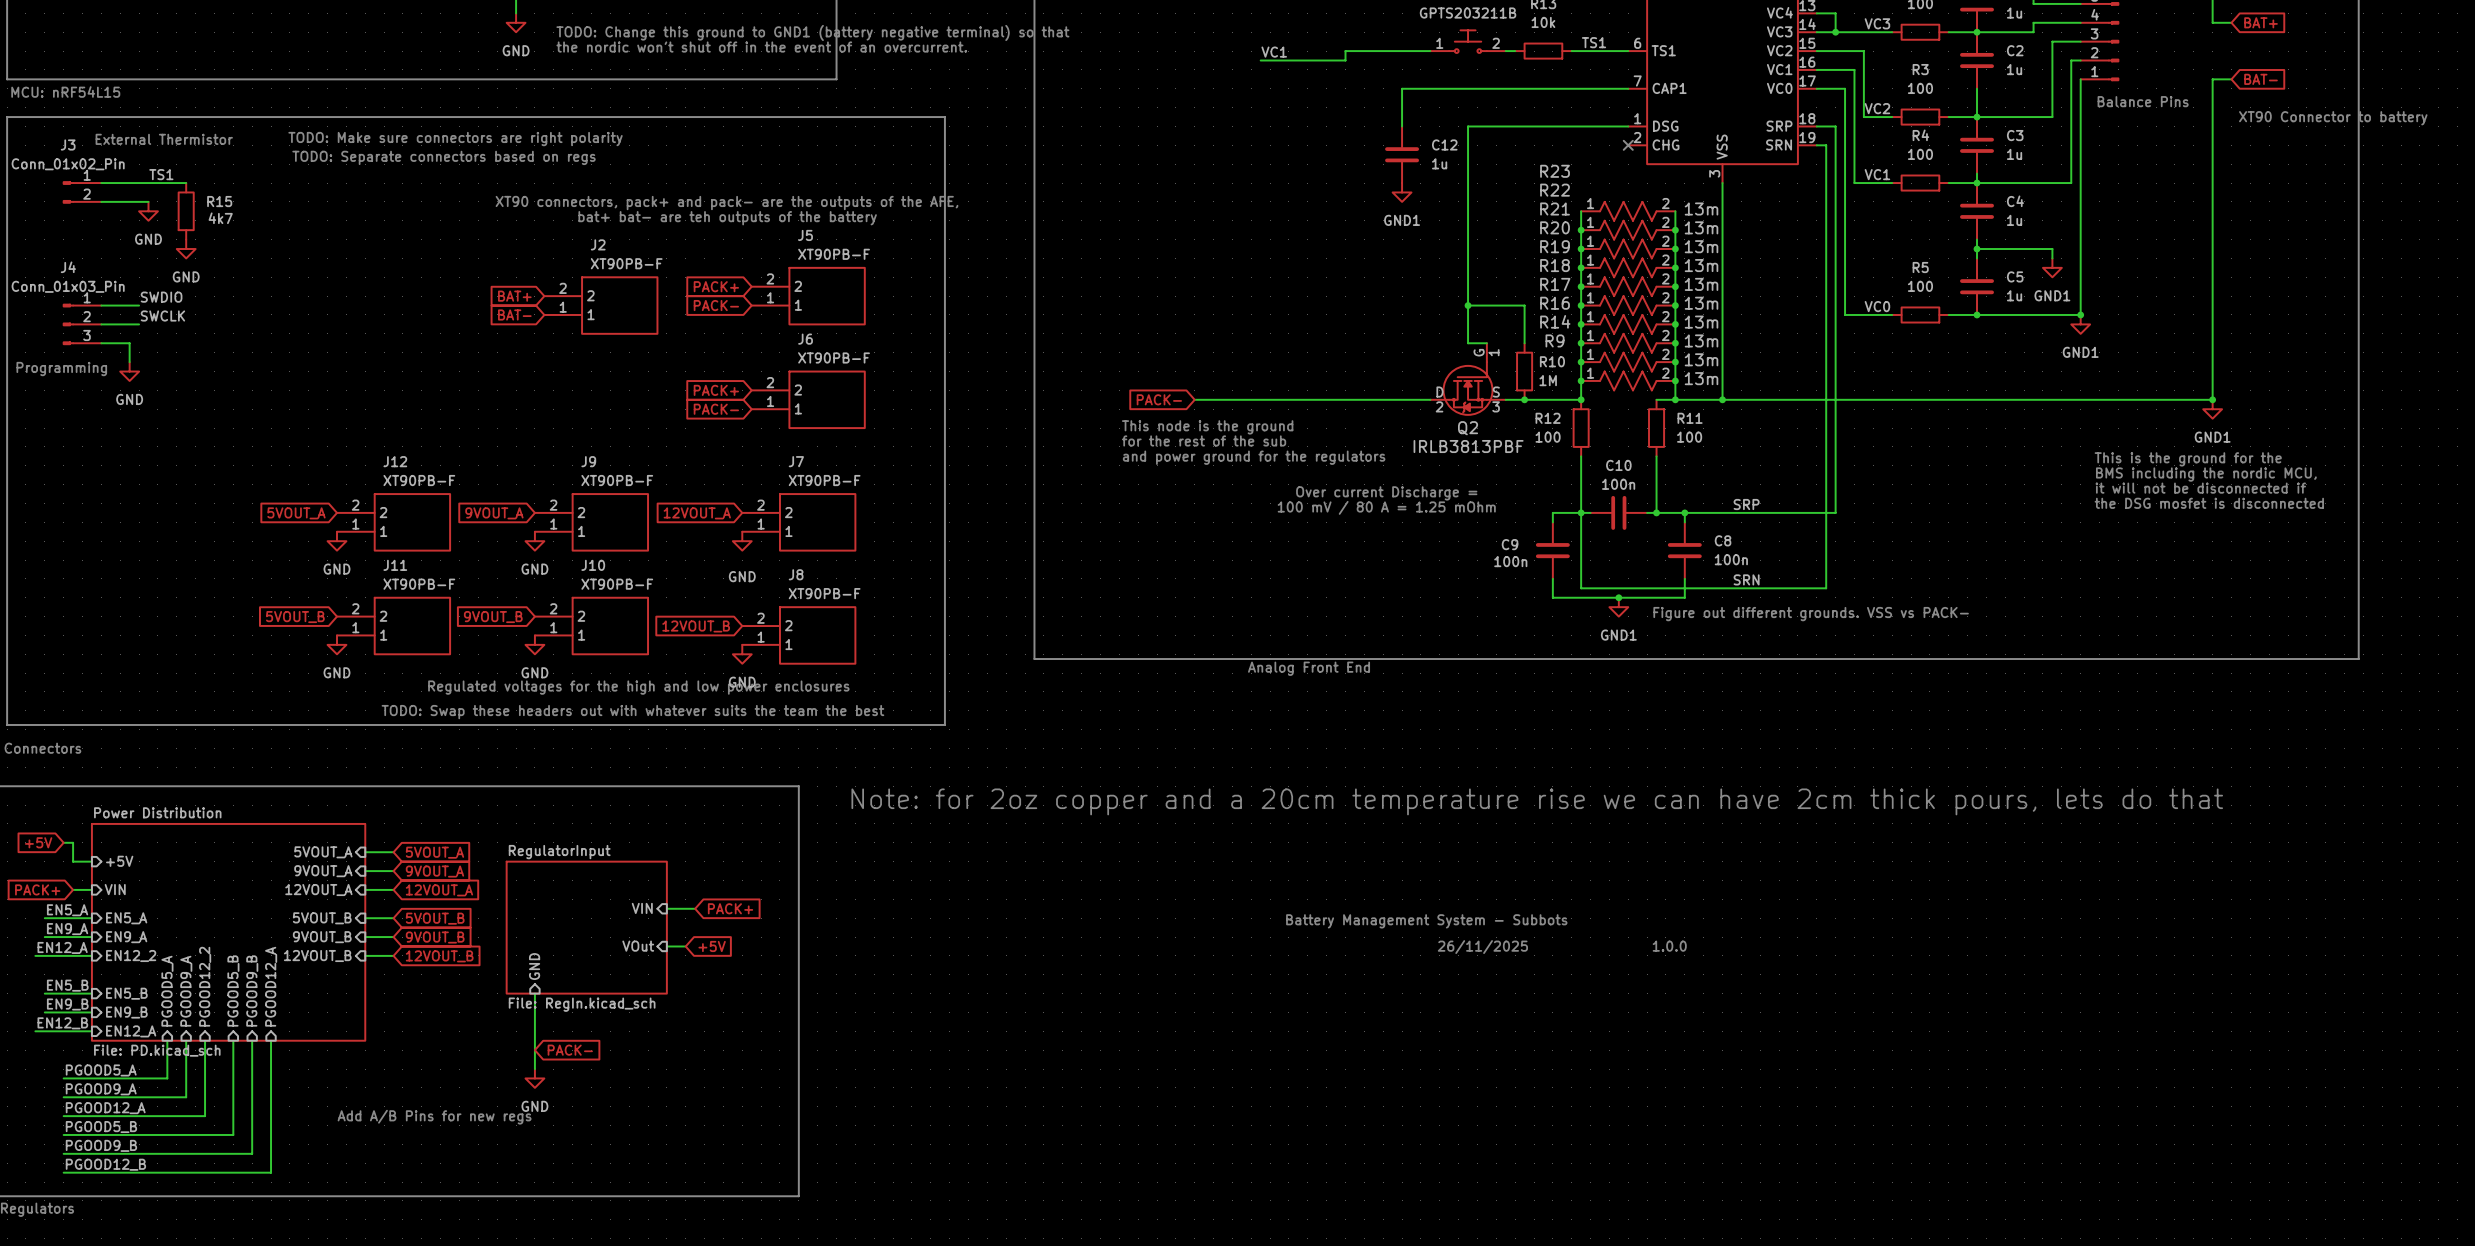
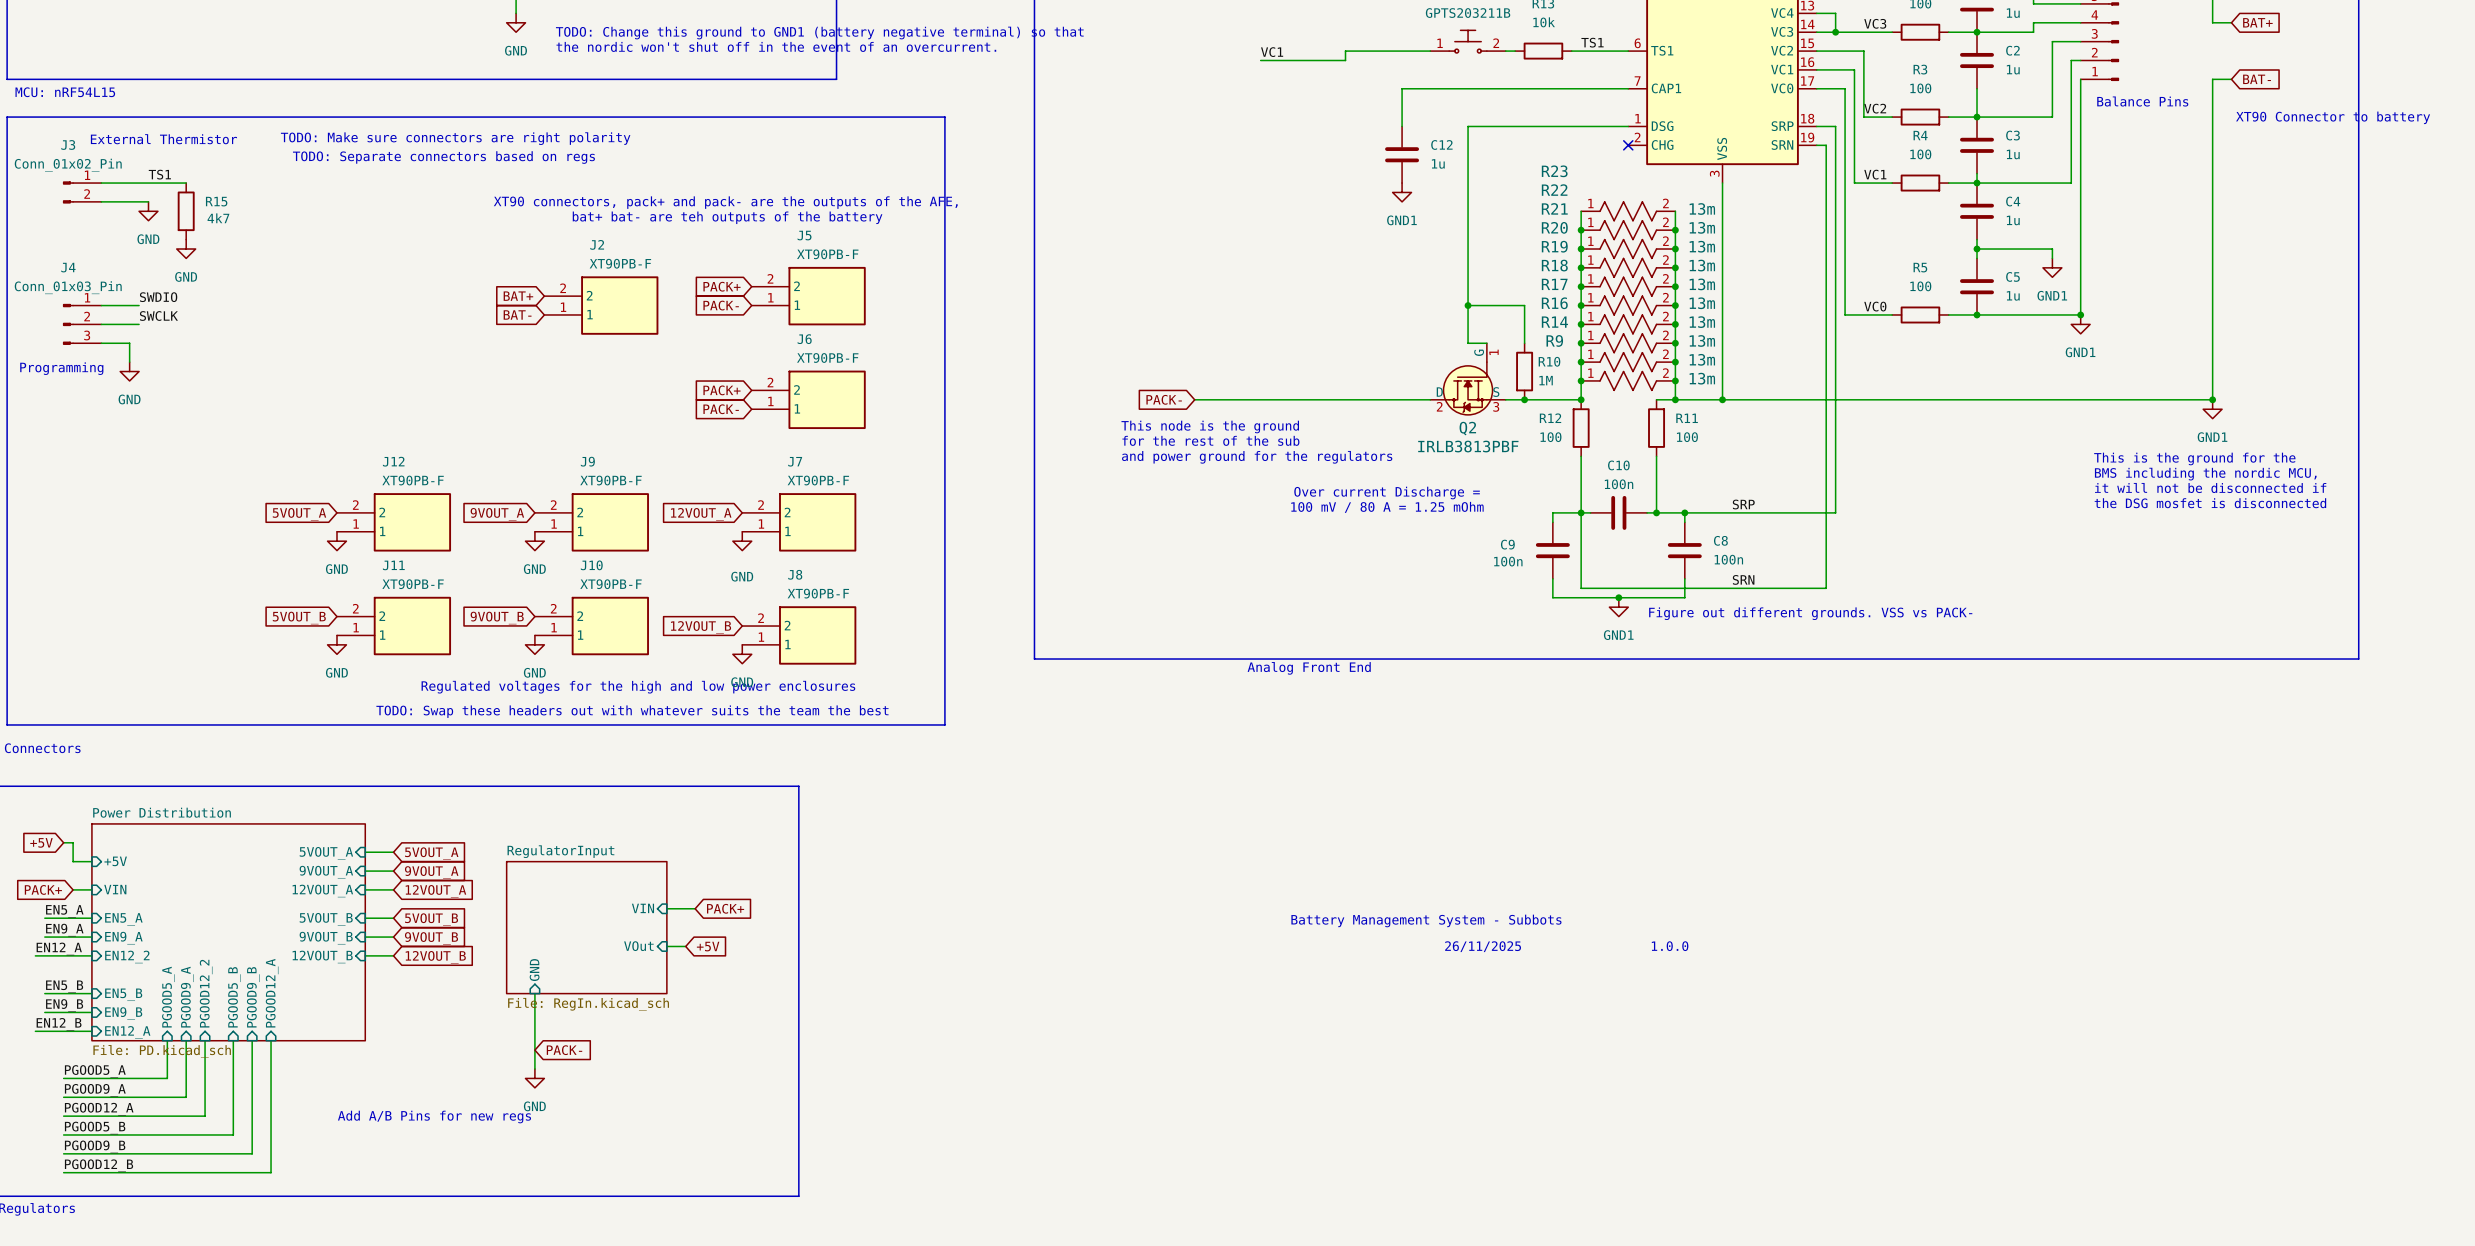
text: Note: for 2oz copper and a 20cm temperature rise we can have 2cm thick pours, lets do that (1537, 801) -> none

